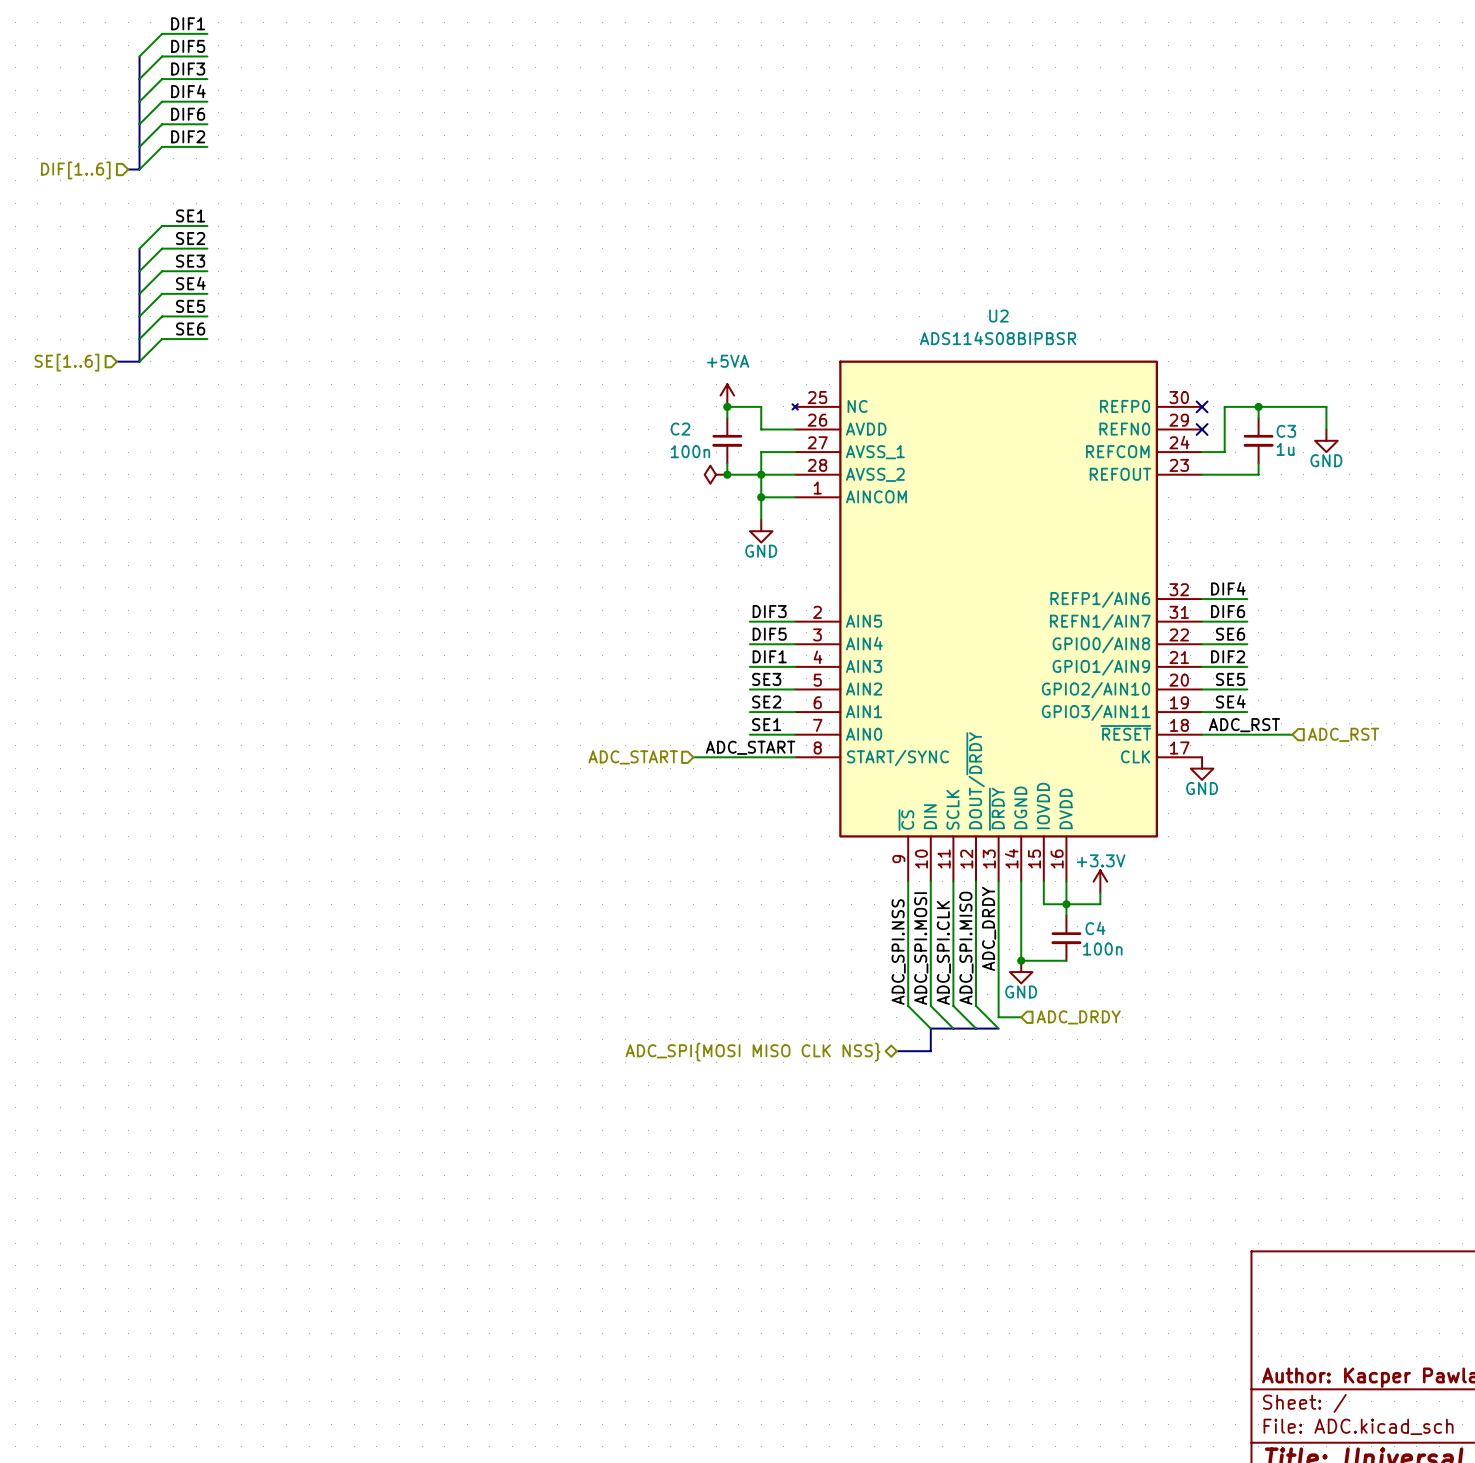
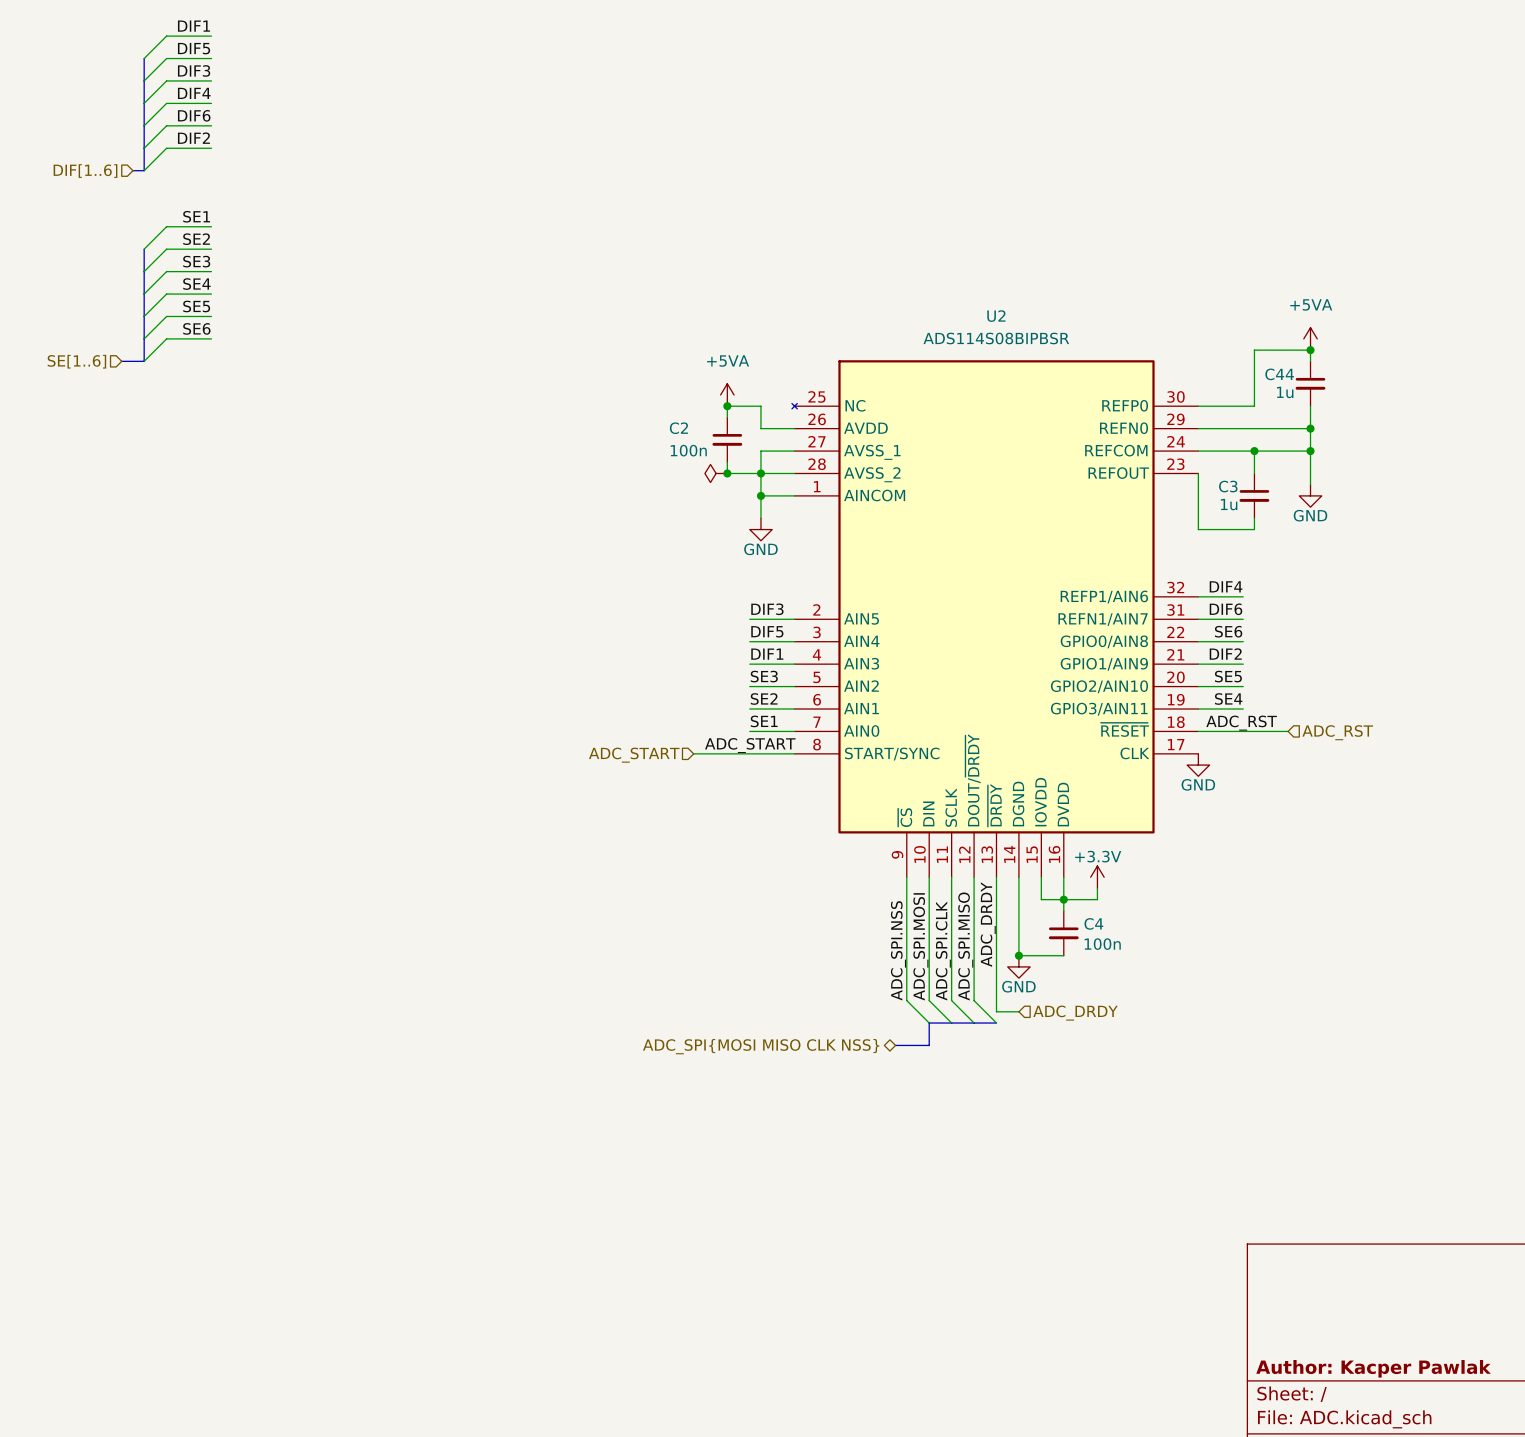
power symbol: none -> +5VA (1310, 338)
junction: none -> (1310, 350)
wire: none -> (1310, 361) (1310, 350) (1254, 350) (1254, 406)
C44: none -> 1u (1310, 383)
no-connect mark: (1202, 406) -> none
wire: (1224, 406) (1224, 452) -> (1220, 406) (1198, 406)
junction: (1258, 406) -> none
wire: none -> (1310, 406) (1310, 484)
wire: (1258, 418) (1258, 406) (1326, 406) (1326, 429) -> none
wire: none -> (1198, 428) (1310, 428)
no-connect mark: (1202, 429) -> none
junction: none -> (1310, 428)
C3 name position: C3 (1286, 431) -> C3 (1228, 486)
C3 position: (1258, 440) -> (1254, 495)
power symbol position: GND (1326, 440) -> GND (1310, 495)
C3 value position: 1u (1285, 449) -> 1u (1229, 504)
wire: none -> (1220, 451) (1310, 451)
junction: none -> (1254, 451)
junction: none -> (1310, 451)
wire: (1202, 474) (1258, 474) -> (1198, 473) (1198, 529) (1254, 529) (1254, 518)

